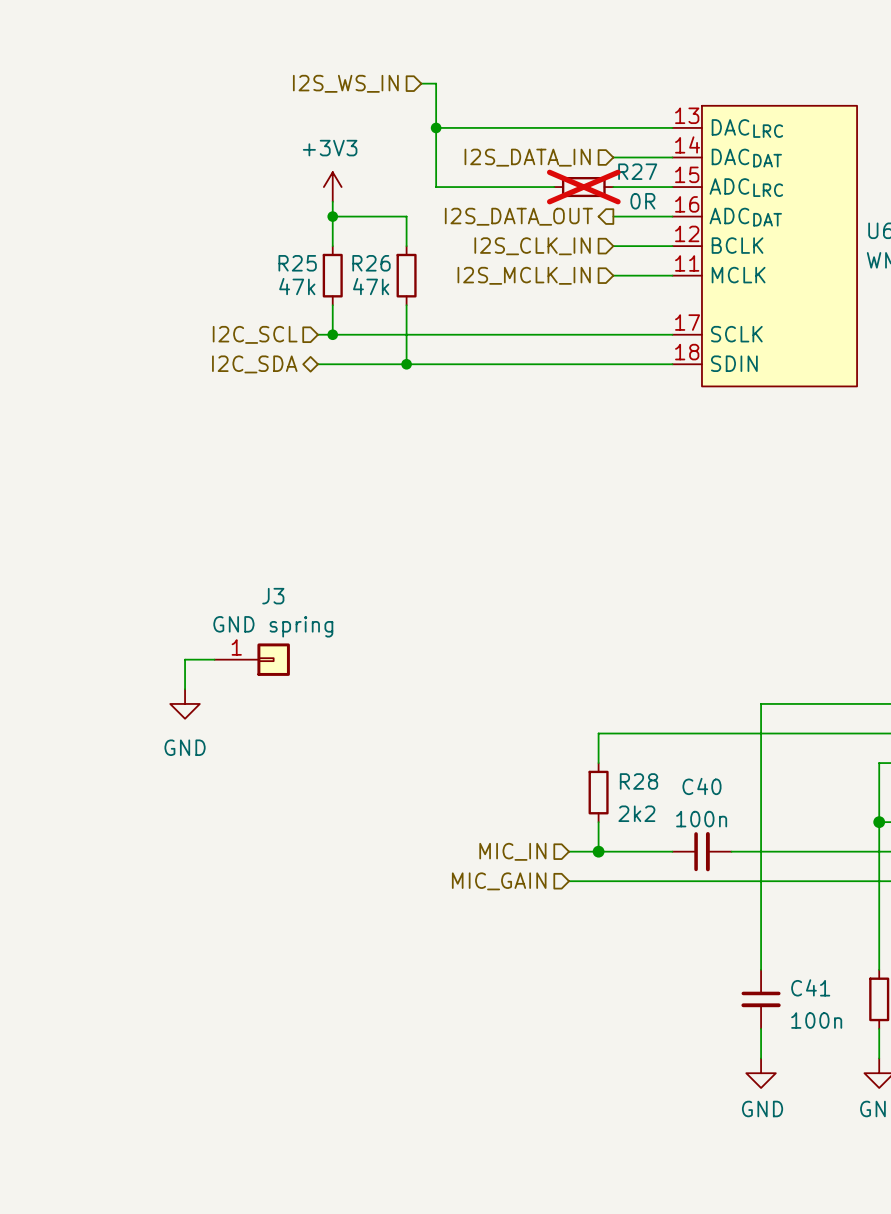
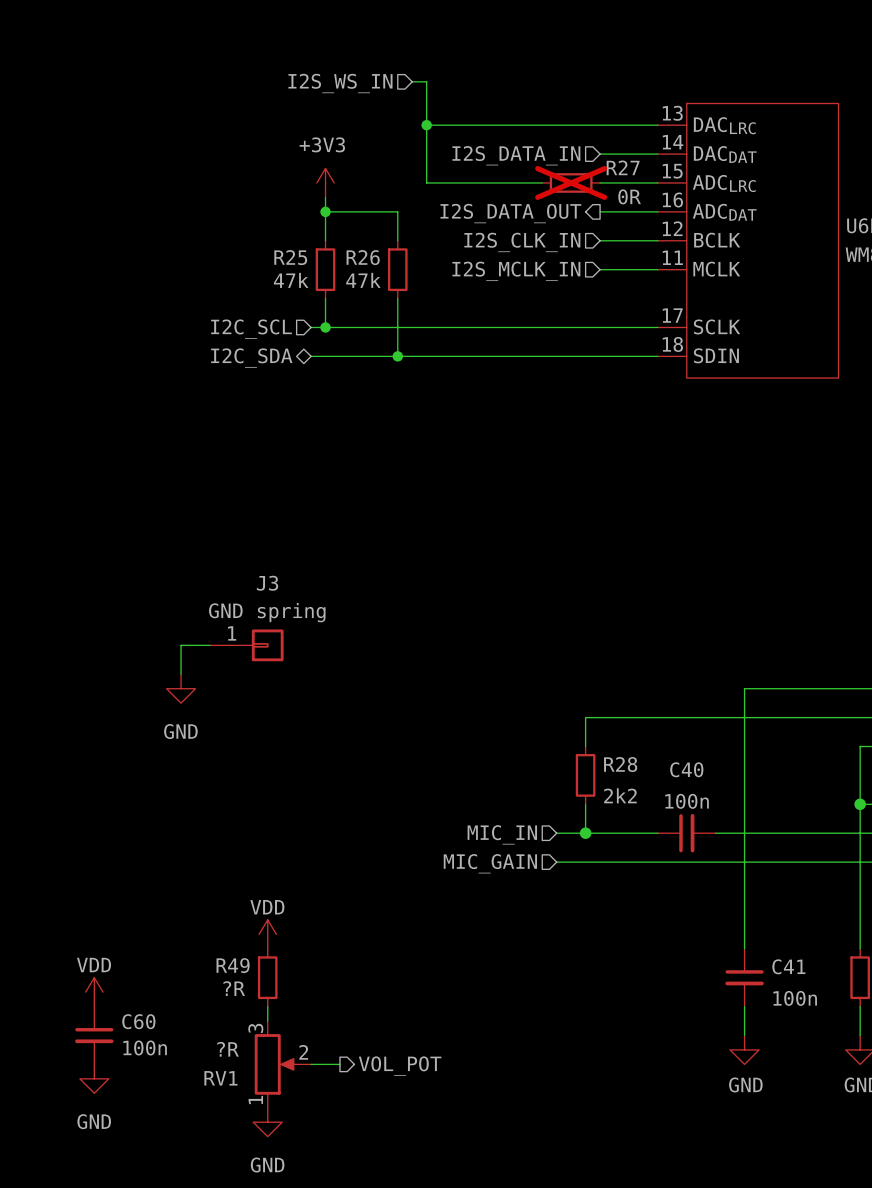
power symbol: none -> VDD (267, 934)
R49: none -> ?R (267, 977)
power symbol: none -> VDD (94, 992)
wire: none -> (267, 1006) (267, 1021)
C60: none -> 100n (94, 1035)
RV1: none -> ?R (282, 1064)
wire: none -> (311, 1064) (339, 1064)
hierarchical label: none -> VOL_POT (400, 1066)
power symbol: none -> GND (94, 1078)
power symbol: none -> GND (267, 1122)

